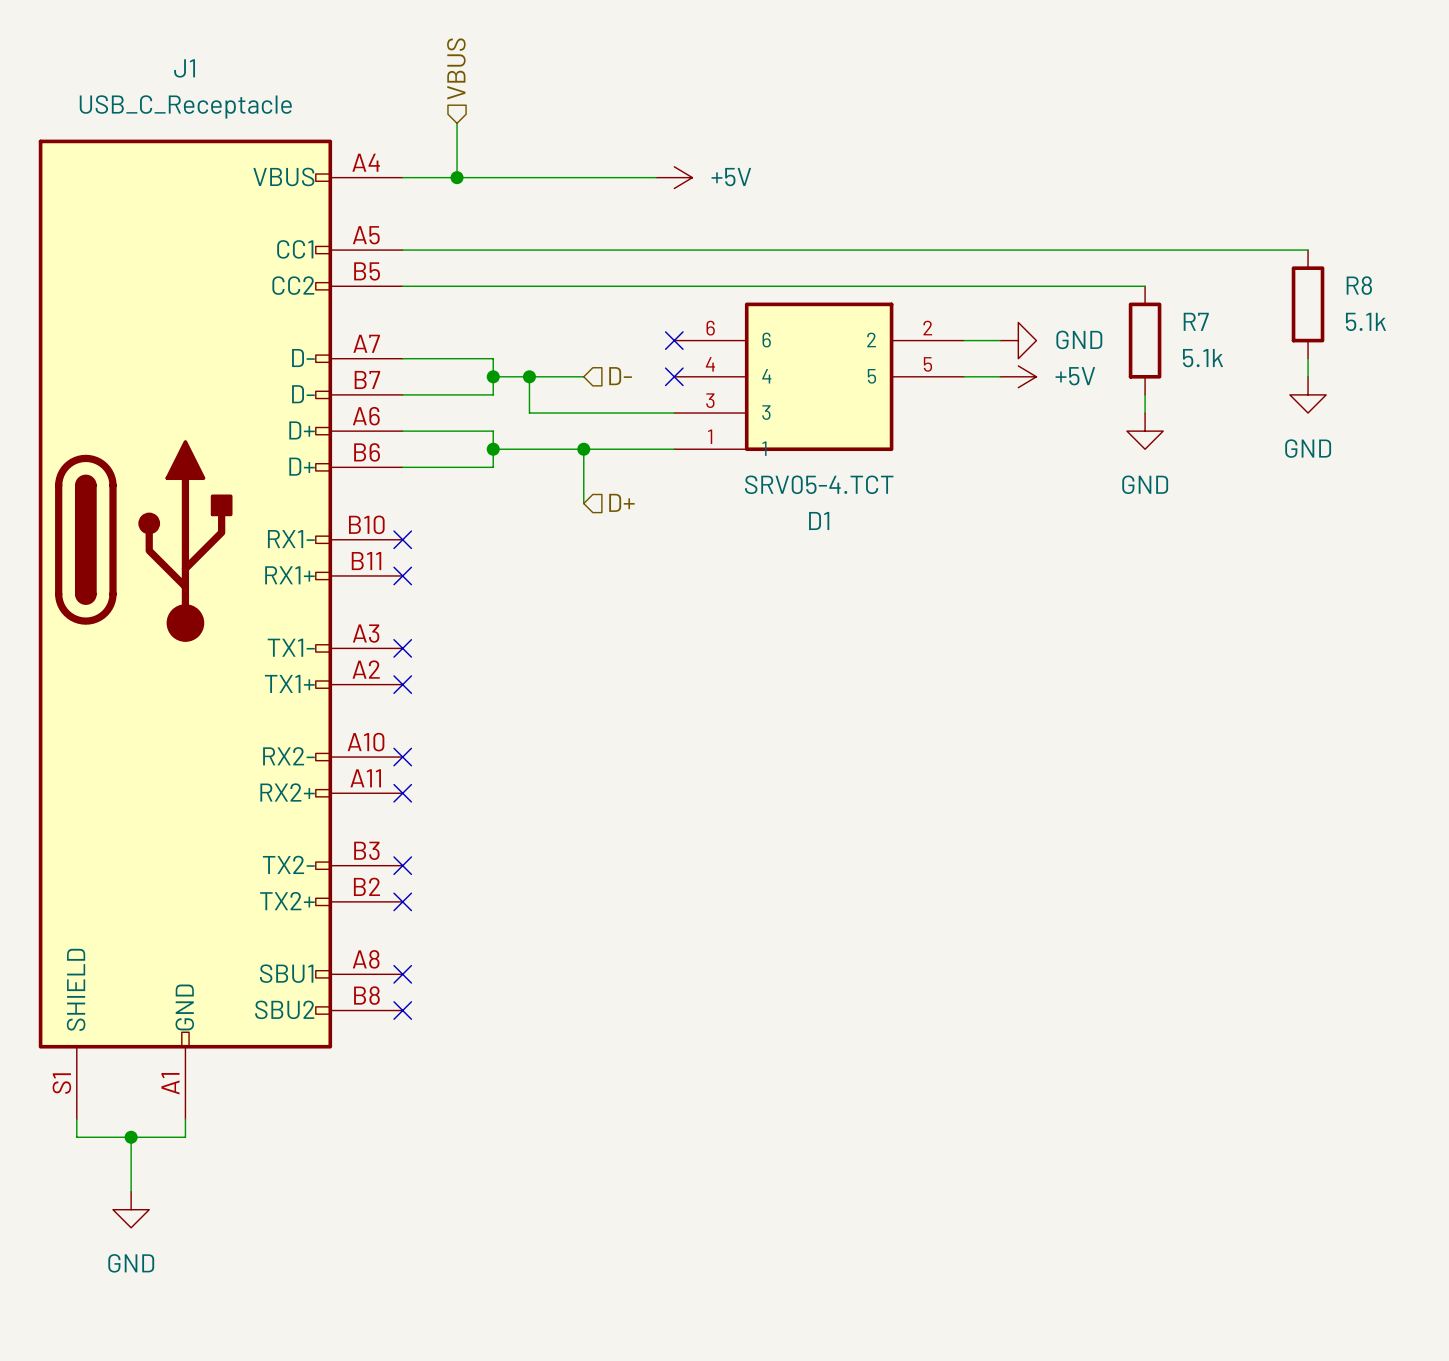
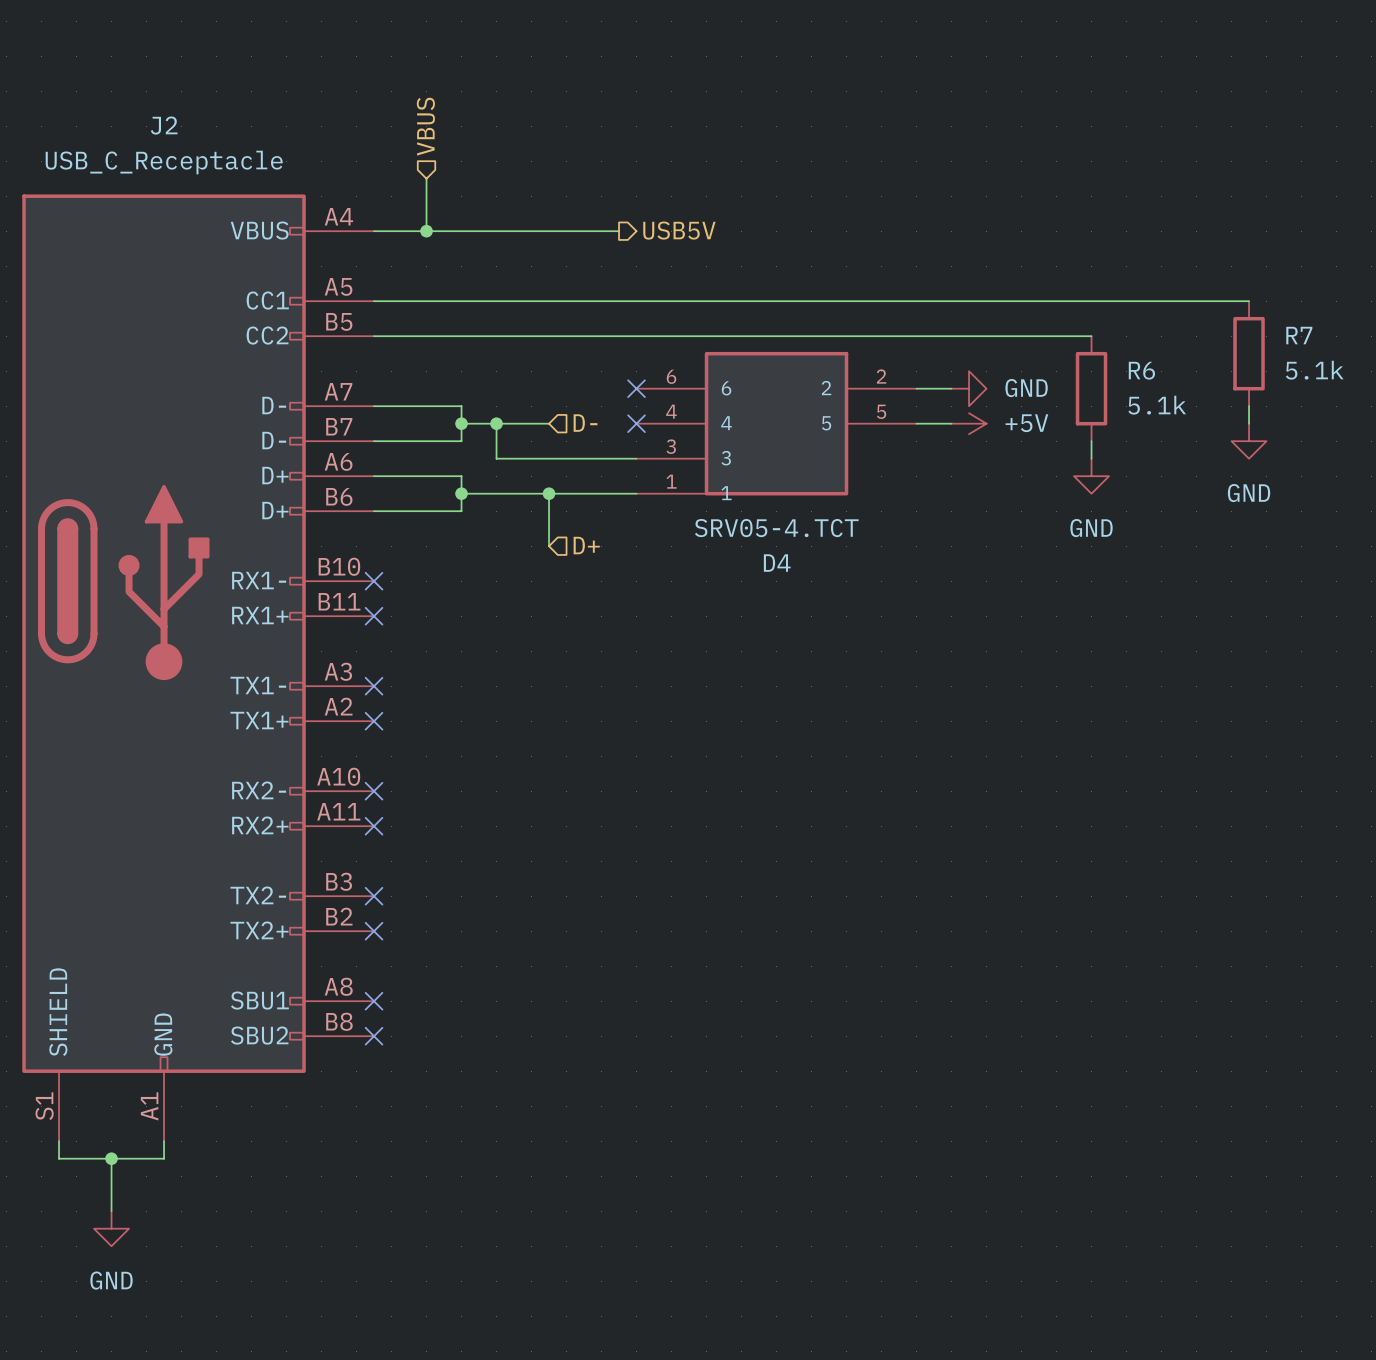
J1 name: J1 (184, 68) -> J2 (164, 125)
hierarchical label: none -> USB5V (679, 230)
power symbol: +5V (674, 177) -> none
R8 name: R8 (1359, 285) -> R7 (1299, 335)
R7 name: R7 (1196, 321) -> R6 (1141, 370)
D1 name: D1 (819, 520) -> D4 (777, 563)

